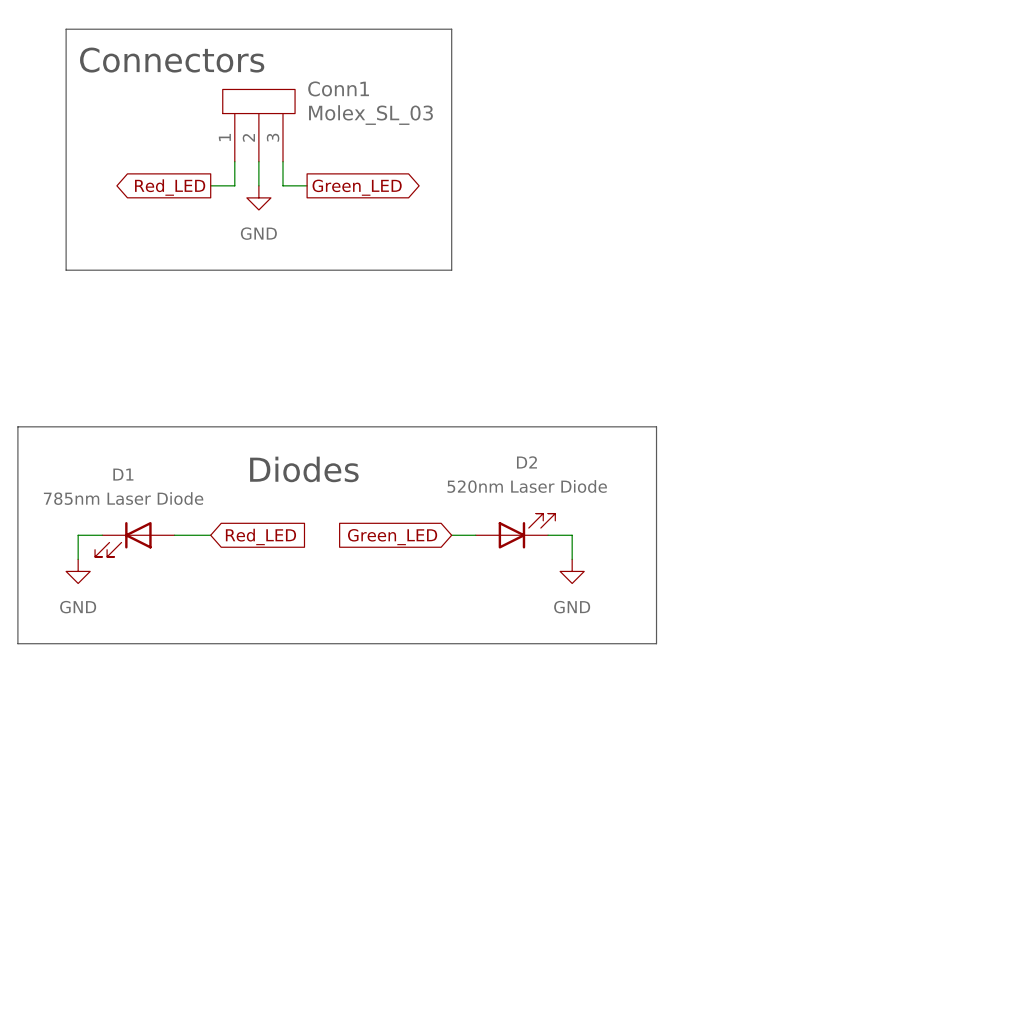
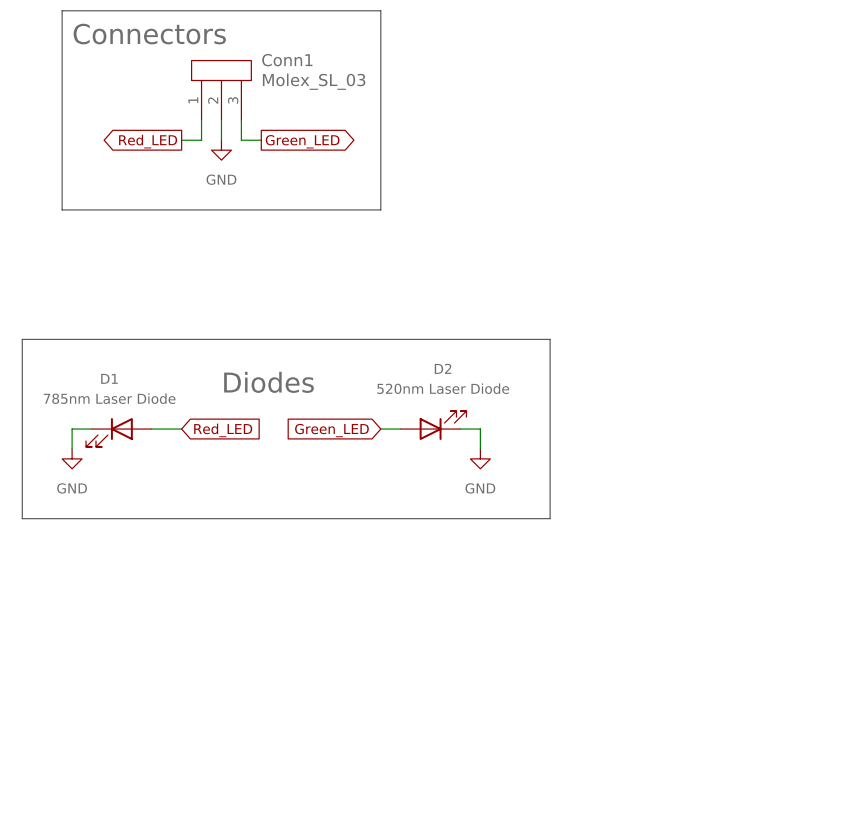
label: none -> Connectors (149, 34)
text: Connectors (172, 60) -> none
text: Diodes (304, 469) -> none
label: none -> Diodes (269, 382)

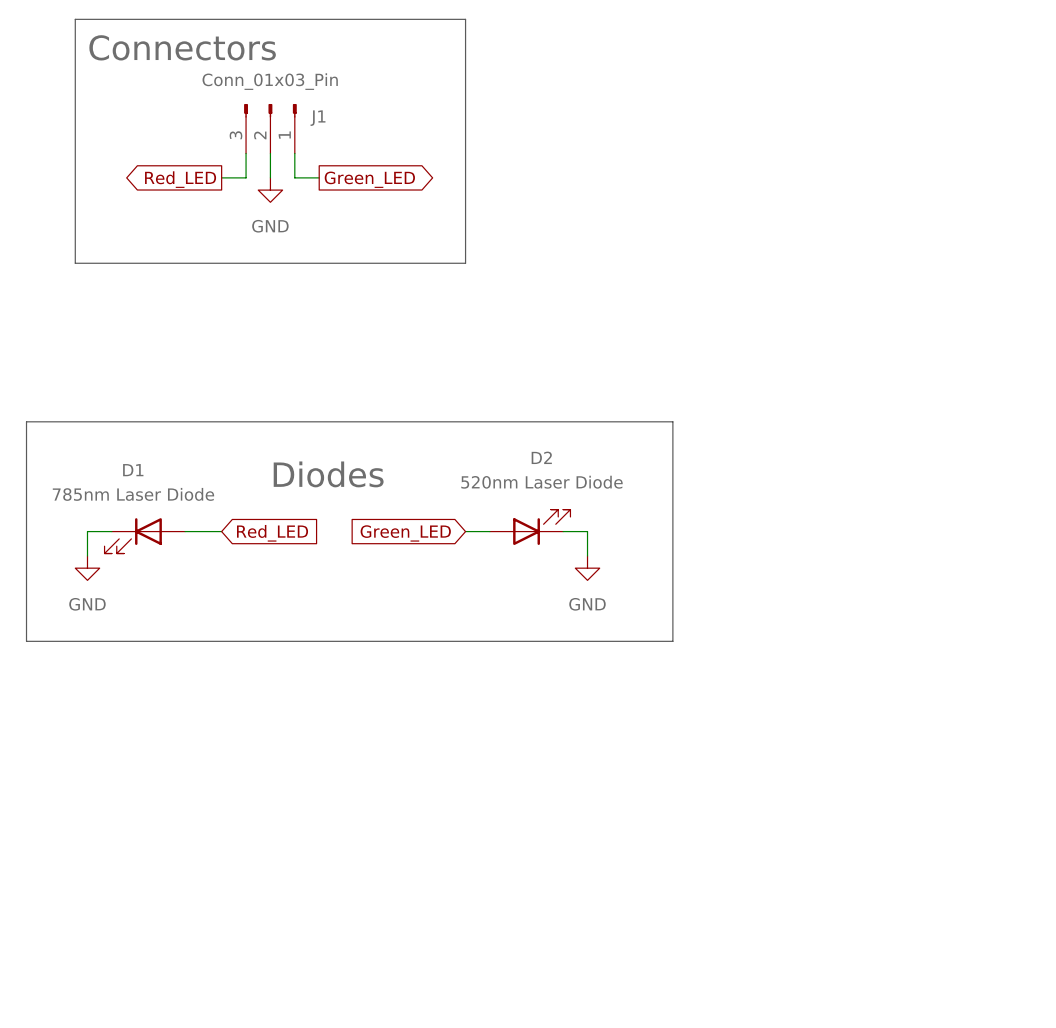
Conn1: Molex_SL_03 (221, 90) -> none
J1: none -> Conn_01x03_Pin (270, 128)

